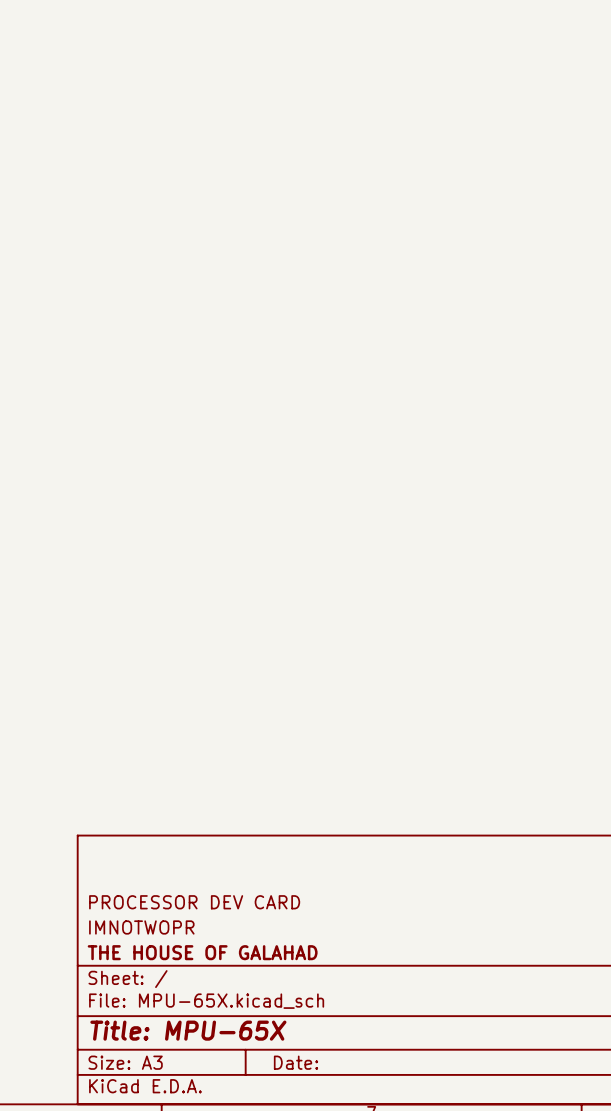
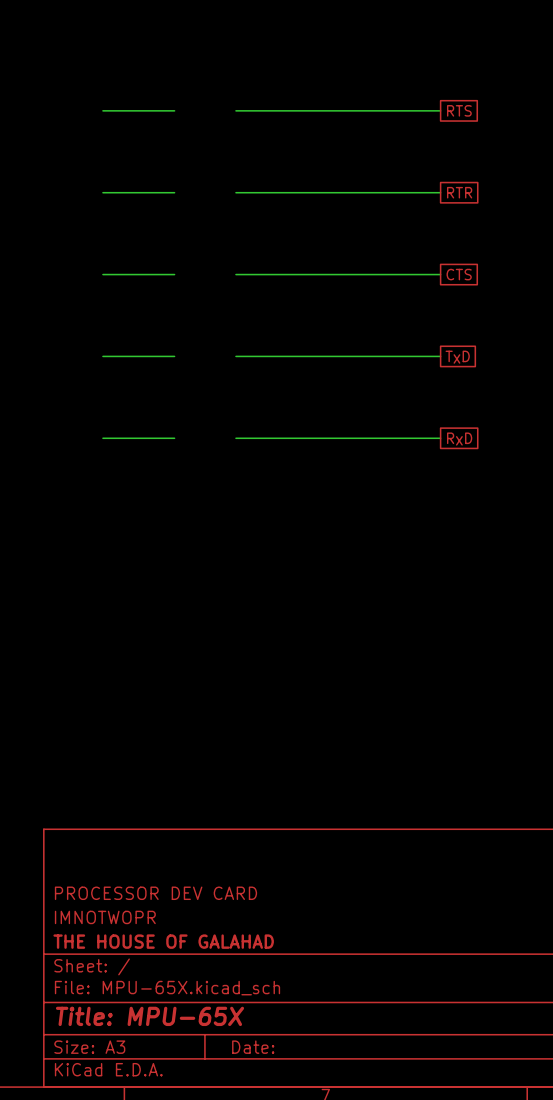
wire: none -> (102, 110) (174, 110)
wire: none -> (235, 110) (440, 110)
global label: none -> RTS (459, 110)
wire: none -> (102, 192) (174, 192)
wire: none -> (235, 192) (440, 192)
global label: none -> RTR (459, 192)
wire: none -> (102, 274) (174, 274)
wire: none -> (235, 274) (440, 274)
global label: none -> CTS (459, 274)
wire: none -> (102, 356) (174, 356)
wire: none -> (235, 356) (440, 356)
global label: none -> TXD (457, 357)
wire: none -> (102, 438) (174, 438)
wire: none -> (235, 438) (440, 438)
global label: none -> RXD (459, 439)

